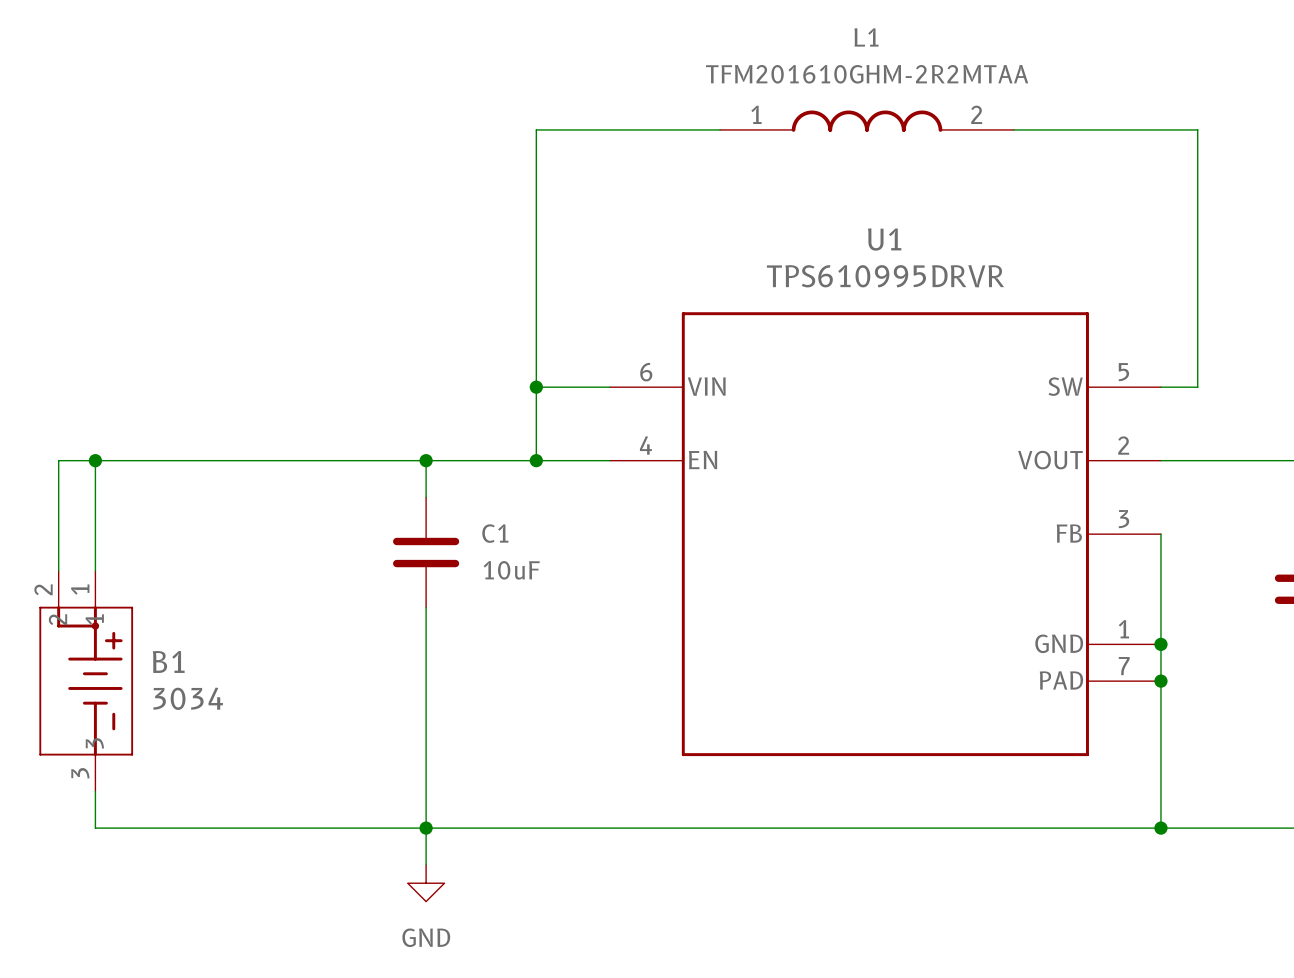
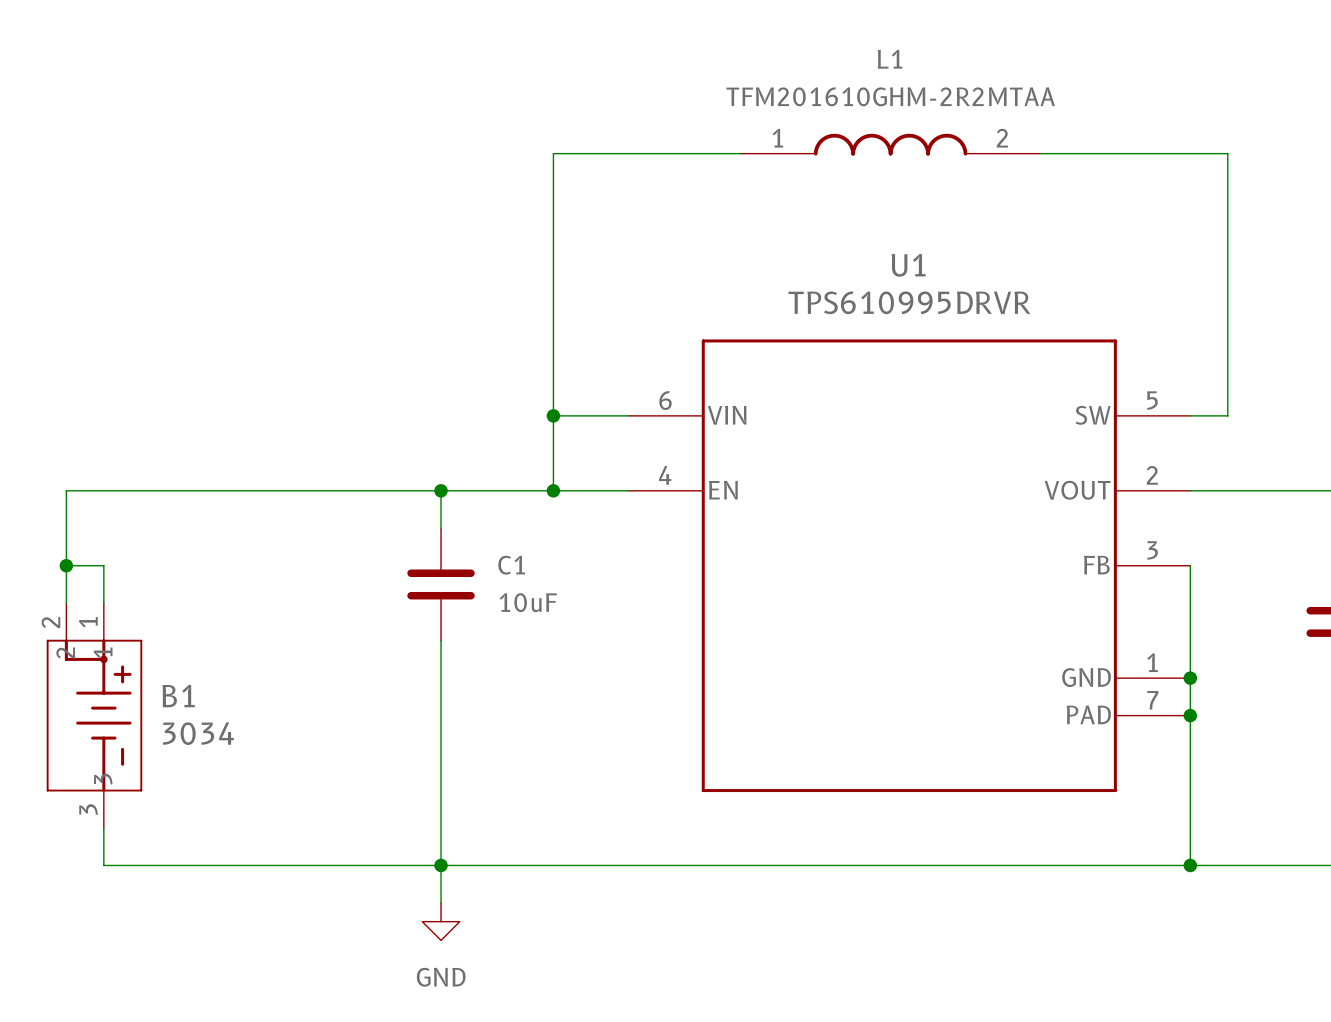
wire: (95, 460) (95, 534) -> (66, 565) (103, 565)
junction position: (95, 460) -> (66, 565)

